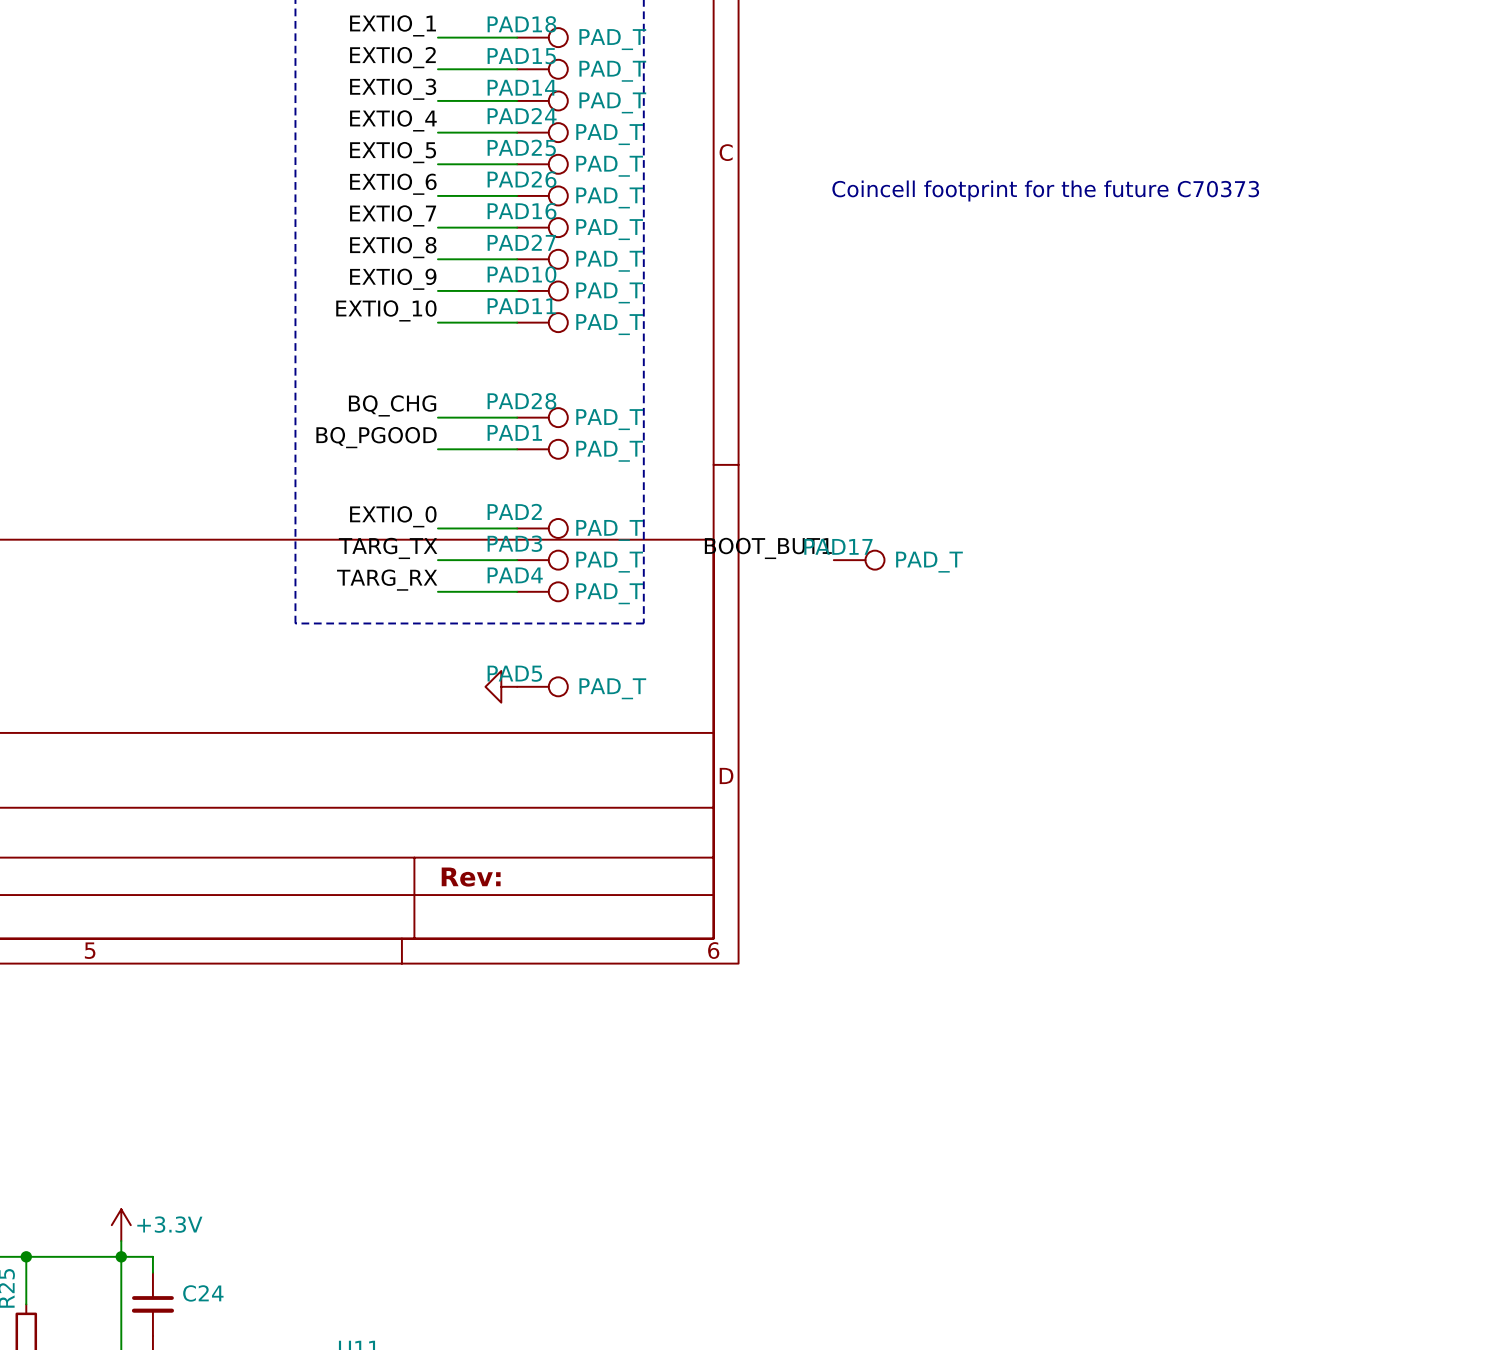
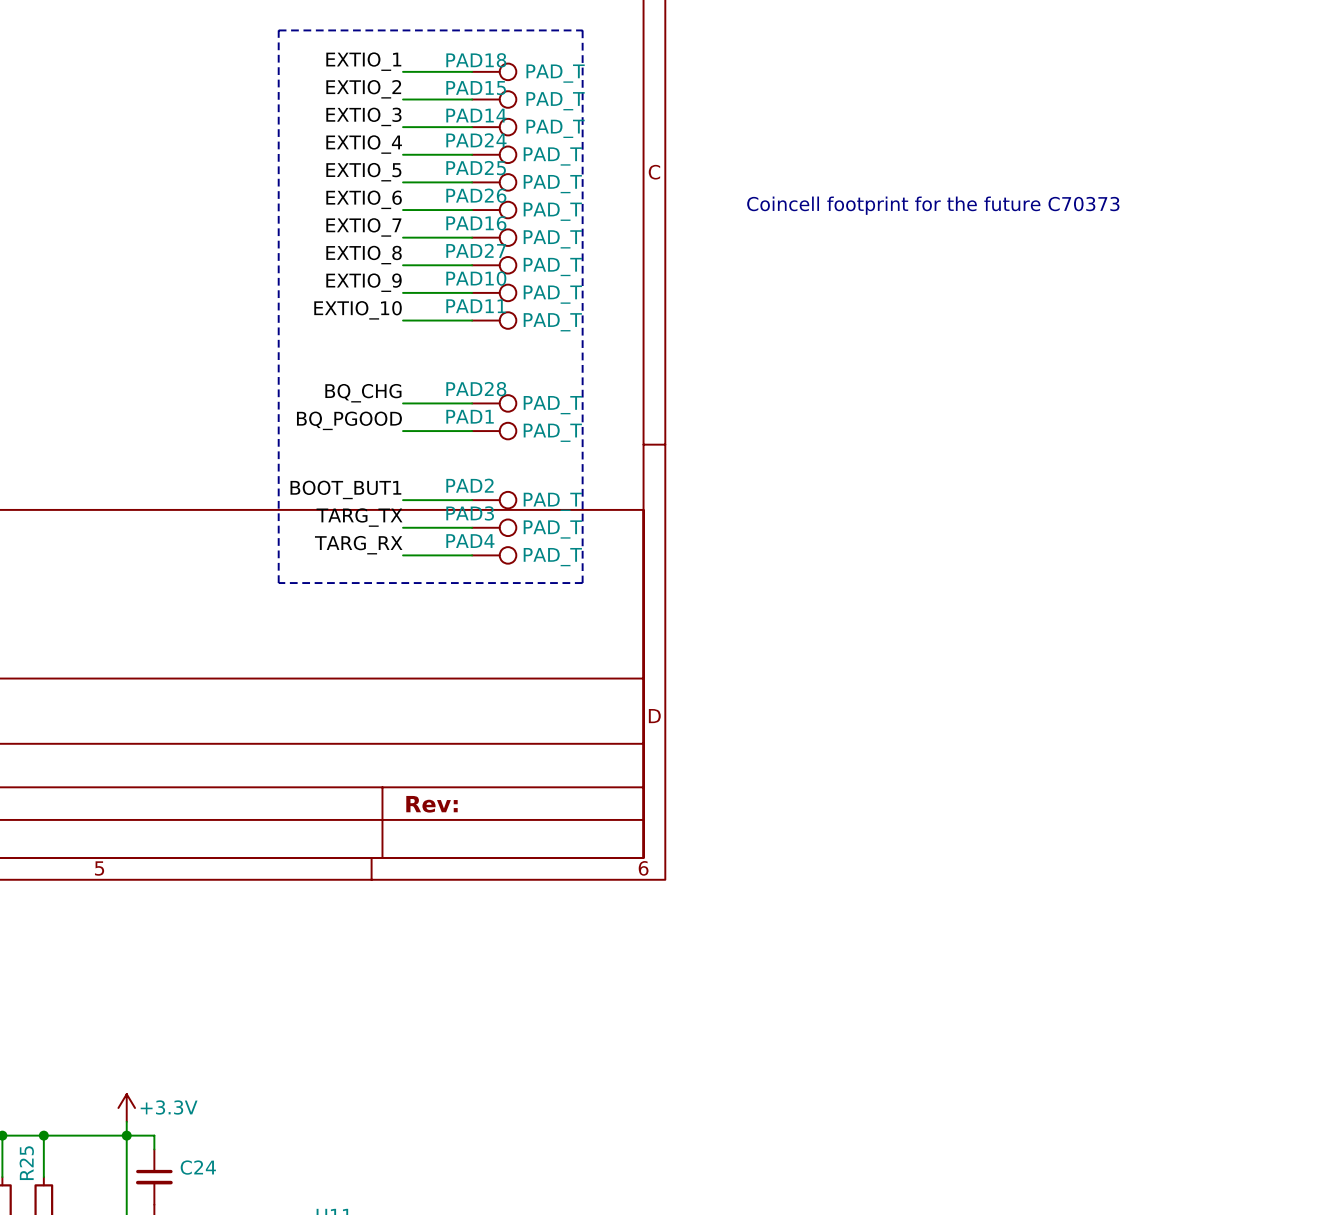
label: EXTIO_0 (393, 516) -> BOOT_BUT1 (345, 489)
label: BOOT_BUT1 (768, 548) -> none
PAD17: PAD_T (859, 560) -> none
power symbol: (501, 686) -> none
PAD5: PAD_T (542, 686) -> none

